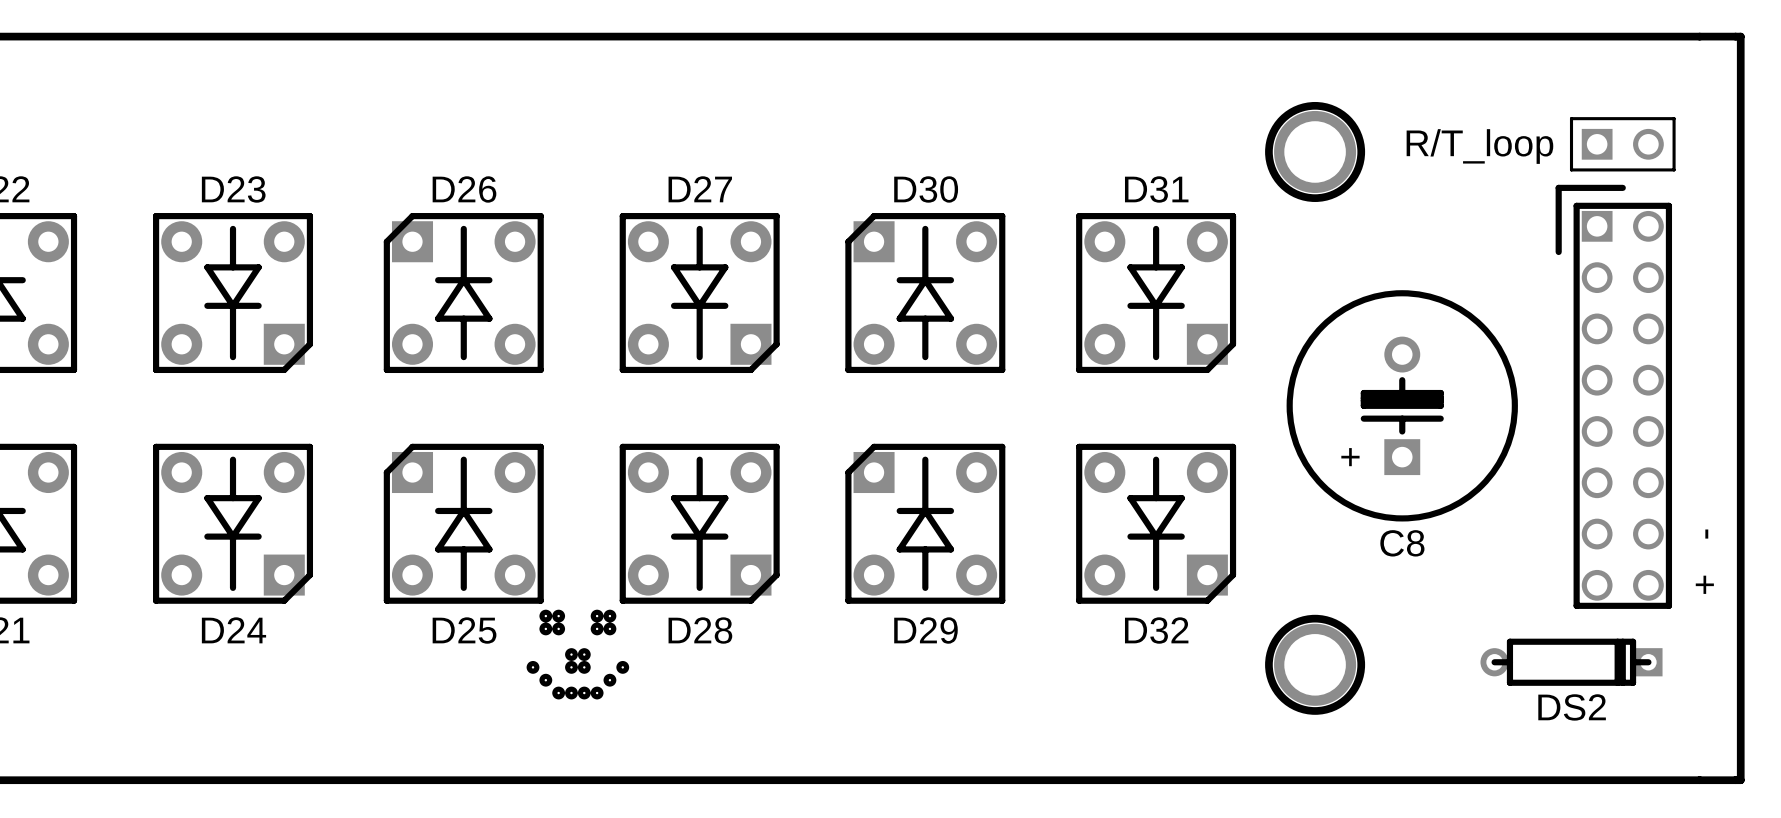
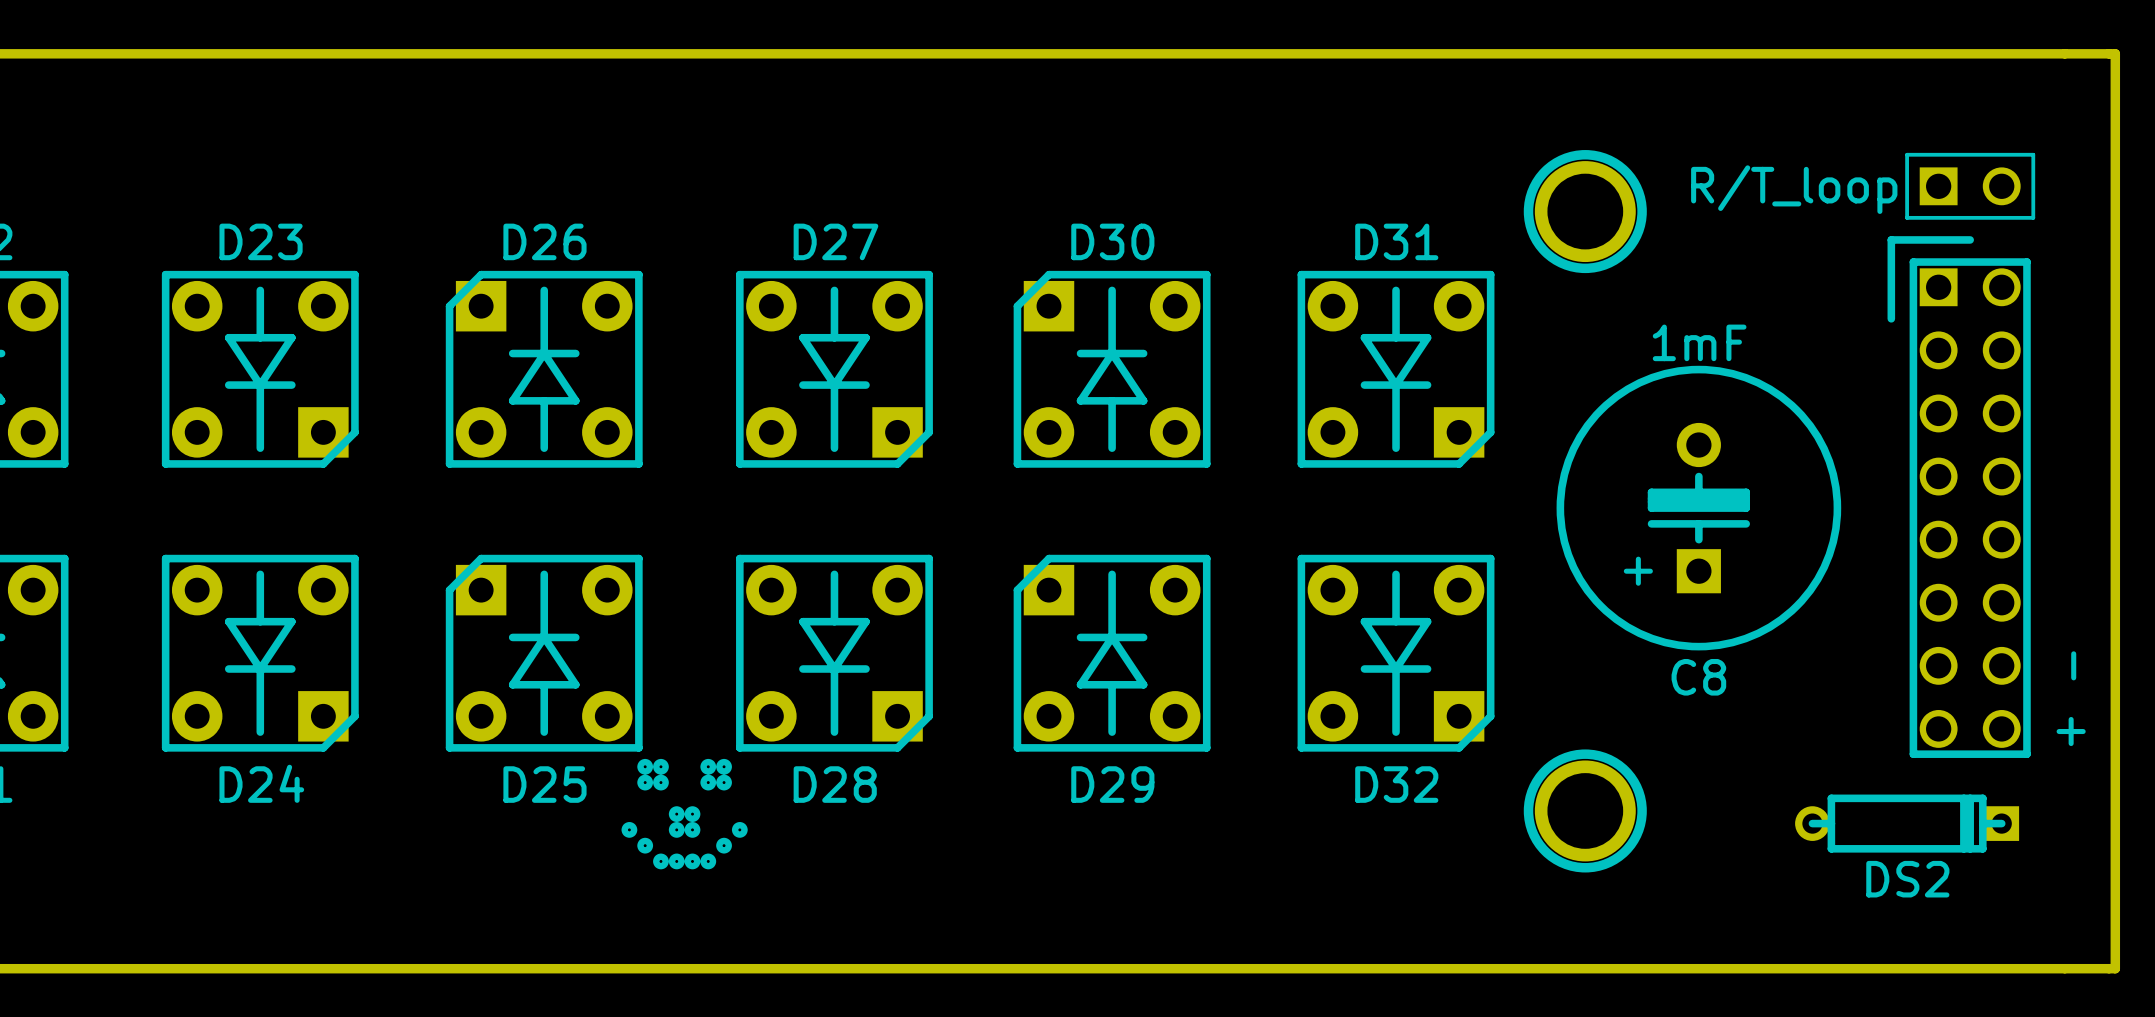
part position: (1315, 151) -> (1585, 211)
C8 value: none -> 1mF (1699, 342)
part position: (1315, 664) -> (1585, 810)

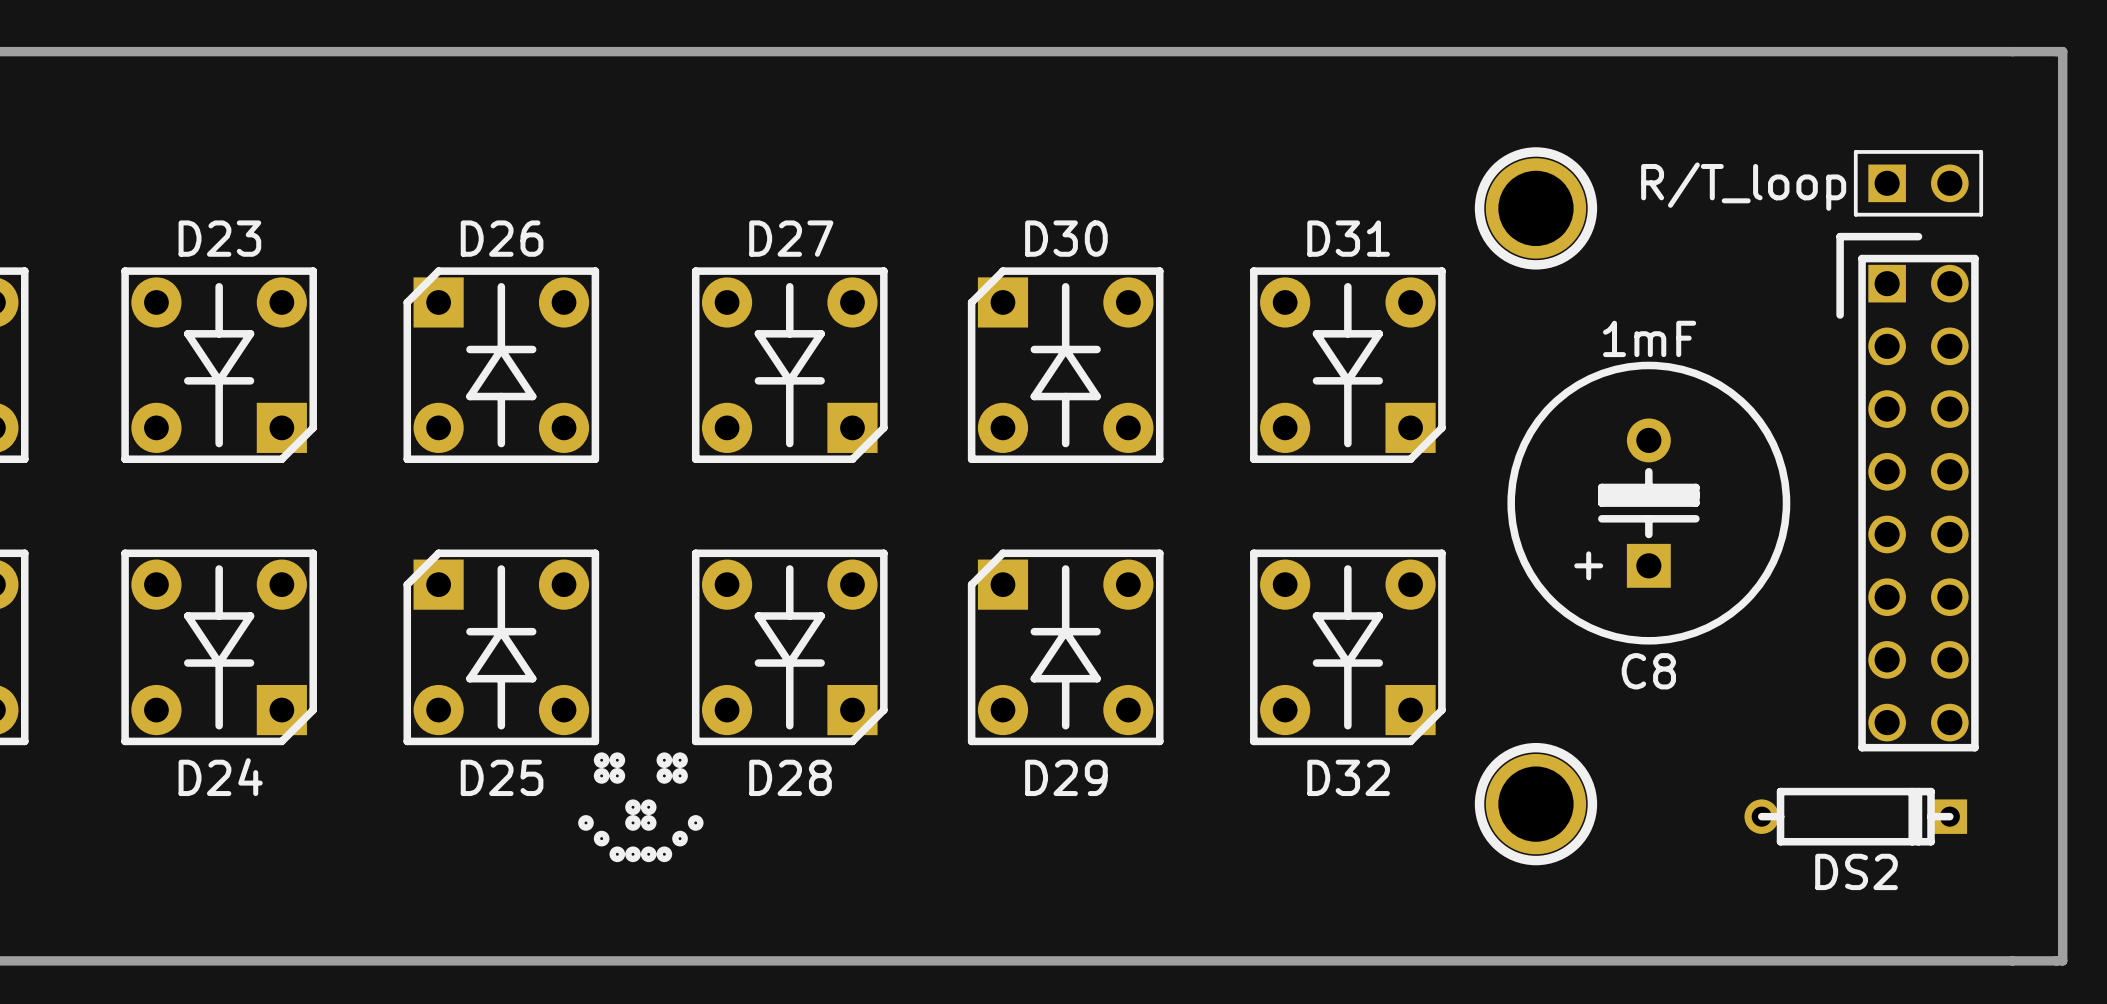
text: - (2073, 665) -> none
text: + (2071, 731) -> none

